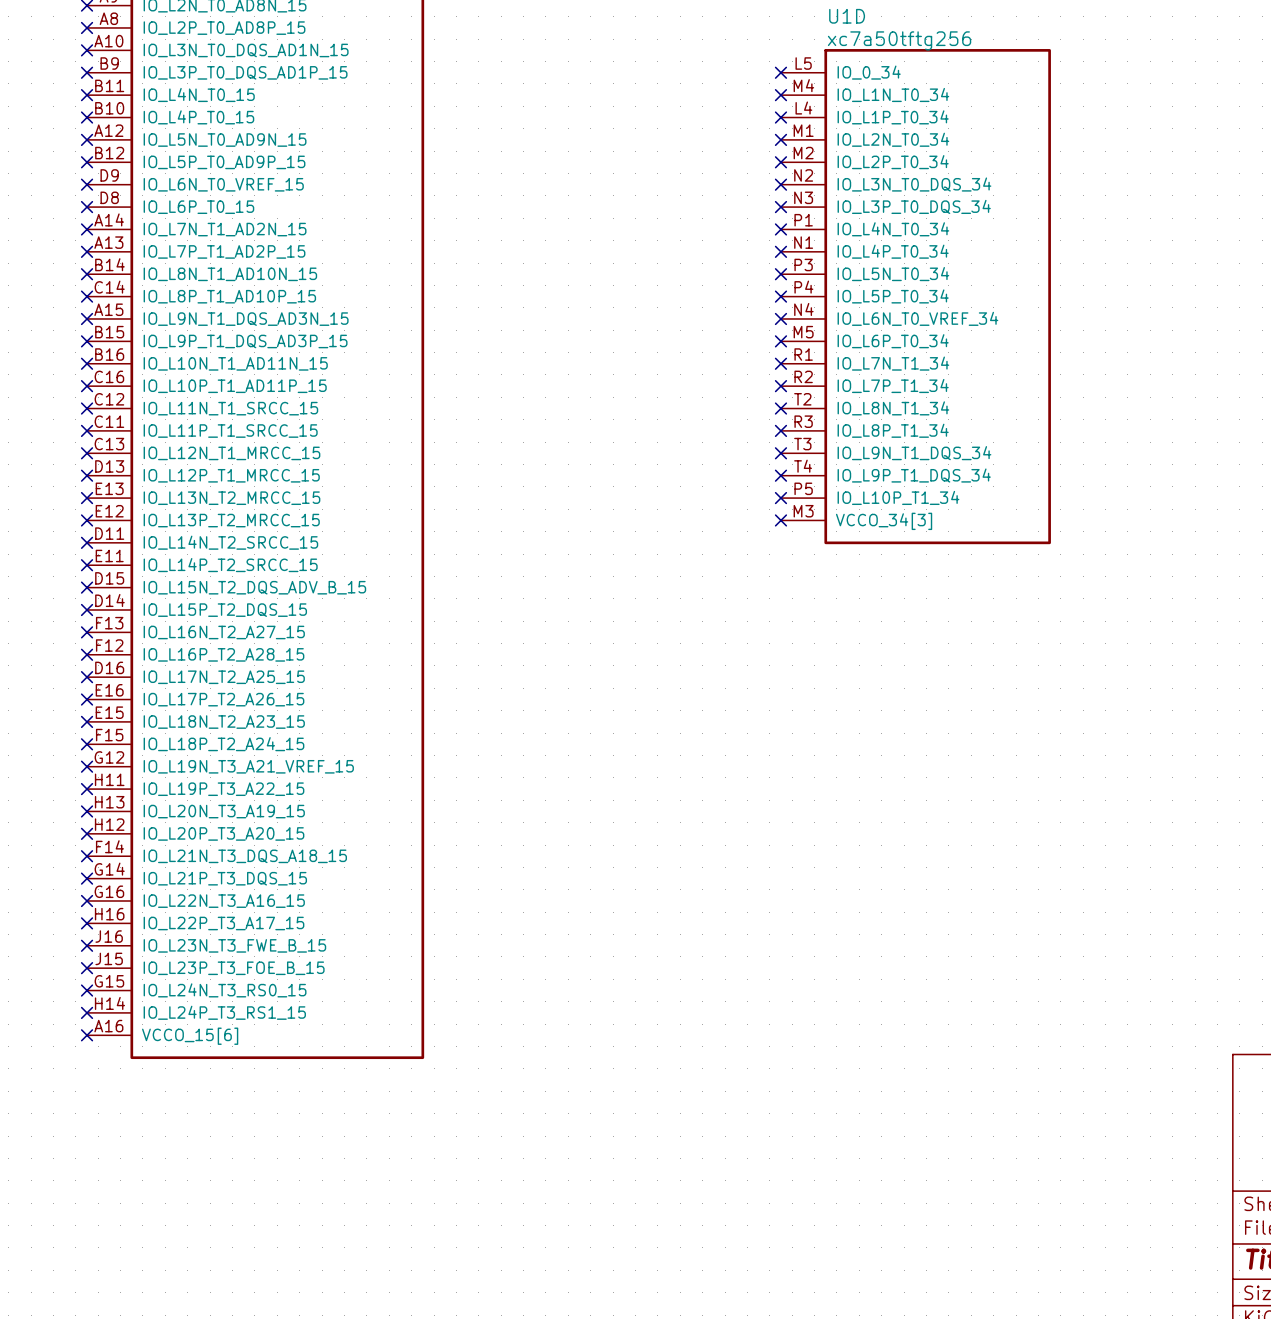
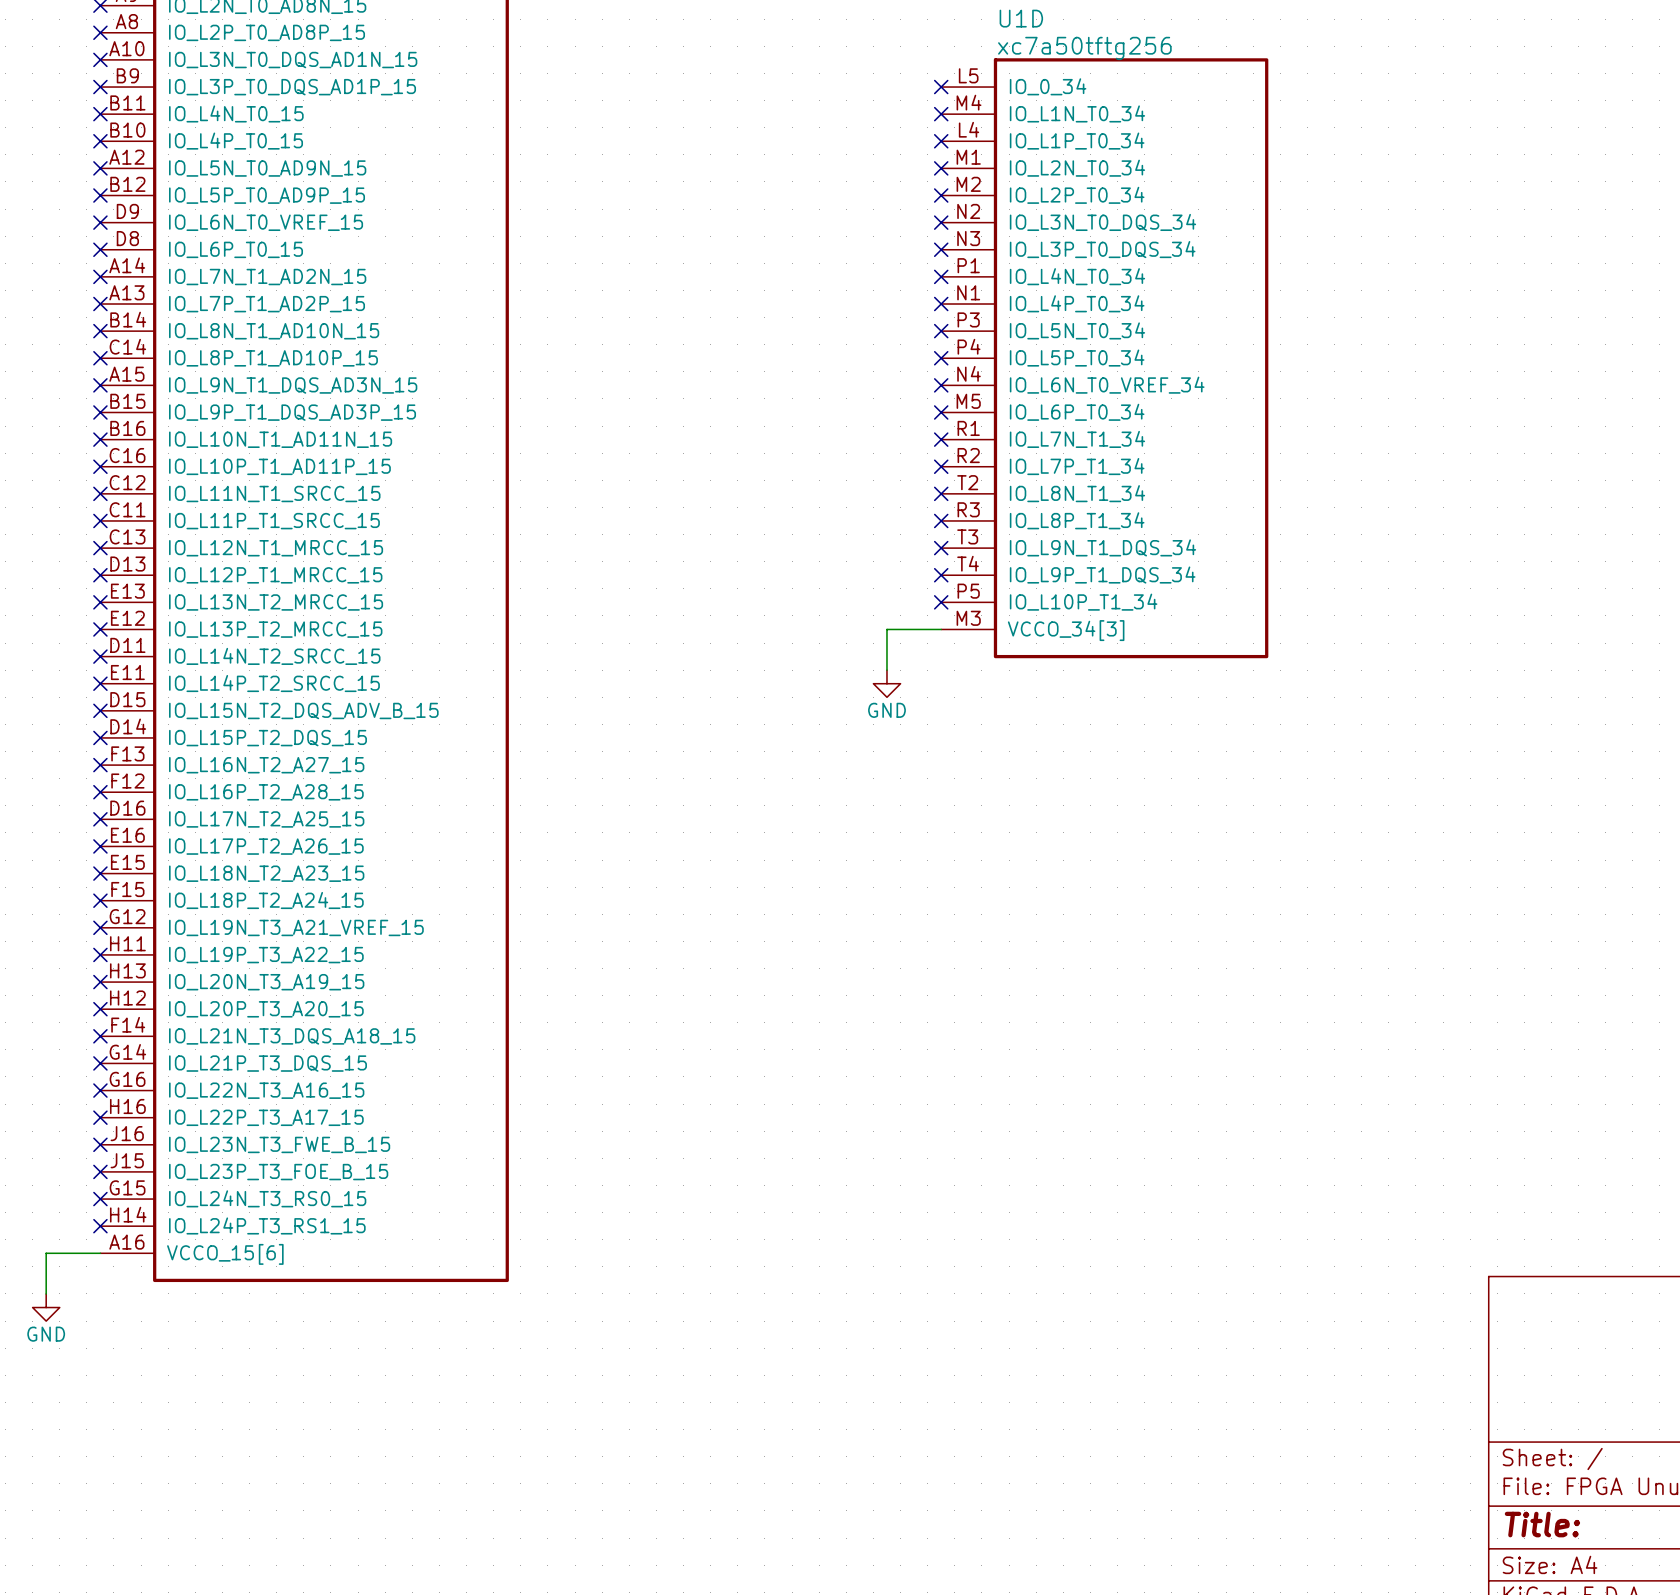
wire: none -> (941, 629) (886, 629) (886, 670)
no-connect mark: (780, 520) -> none
power symbol: none -> GND (886, 683)
wire: none -> (100, 1253) (46, 1253) (46, 1293)
no-connect mark: (87, 1035) -> none
power symbol: none -> GND (46, 1307)

